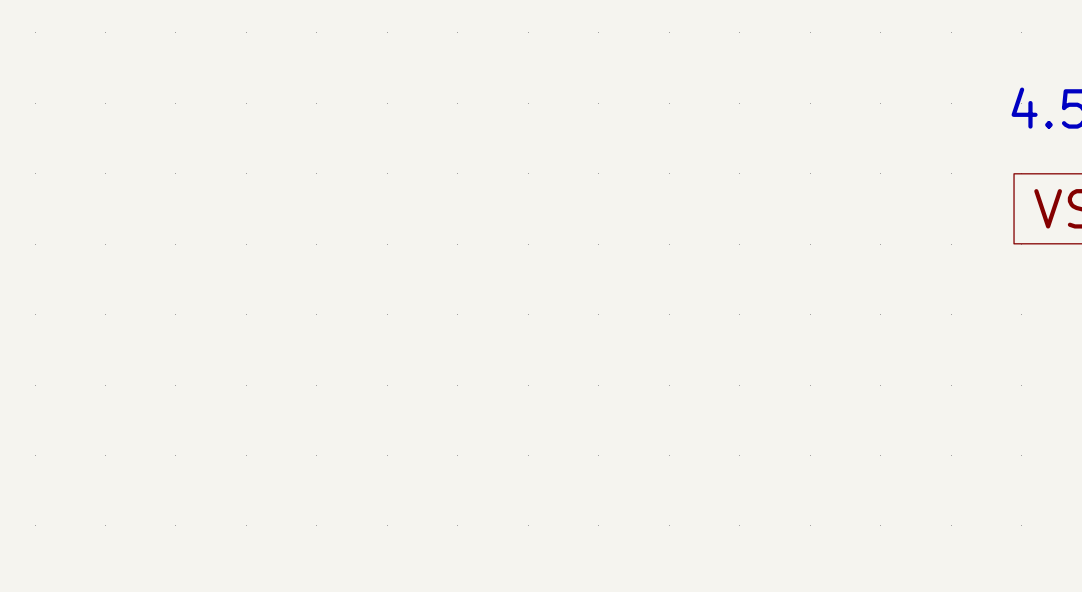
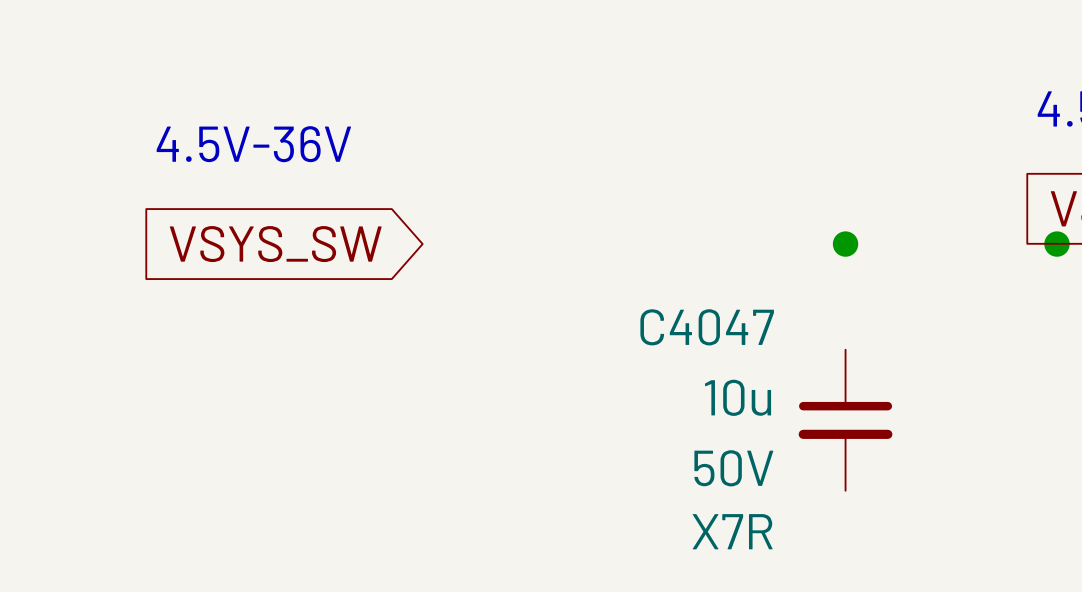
text: none -> 4.5V-36V (253, 144)
junction: none -> (845, 244)
junction: none -> (1056, 244)
global label: none -> VSYS_SW (275, 244)
C4047: none -> 10u (845, 420)

